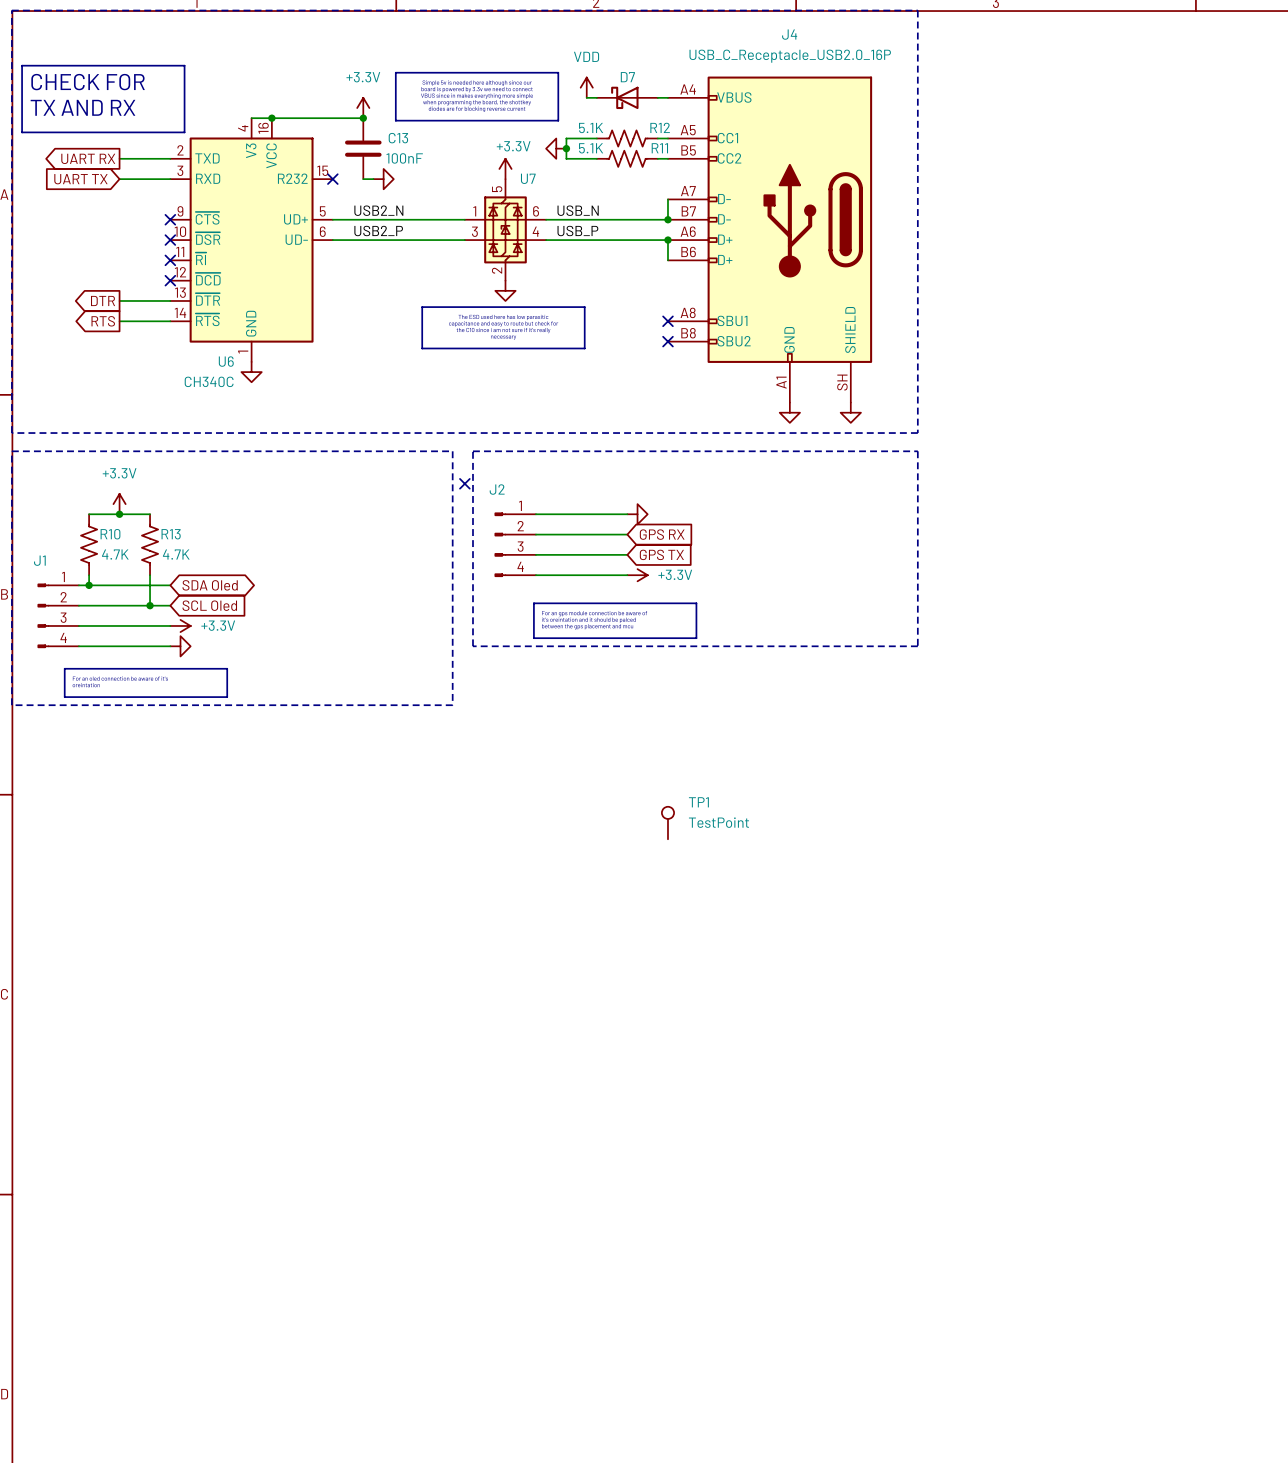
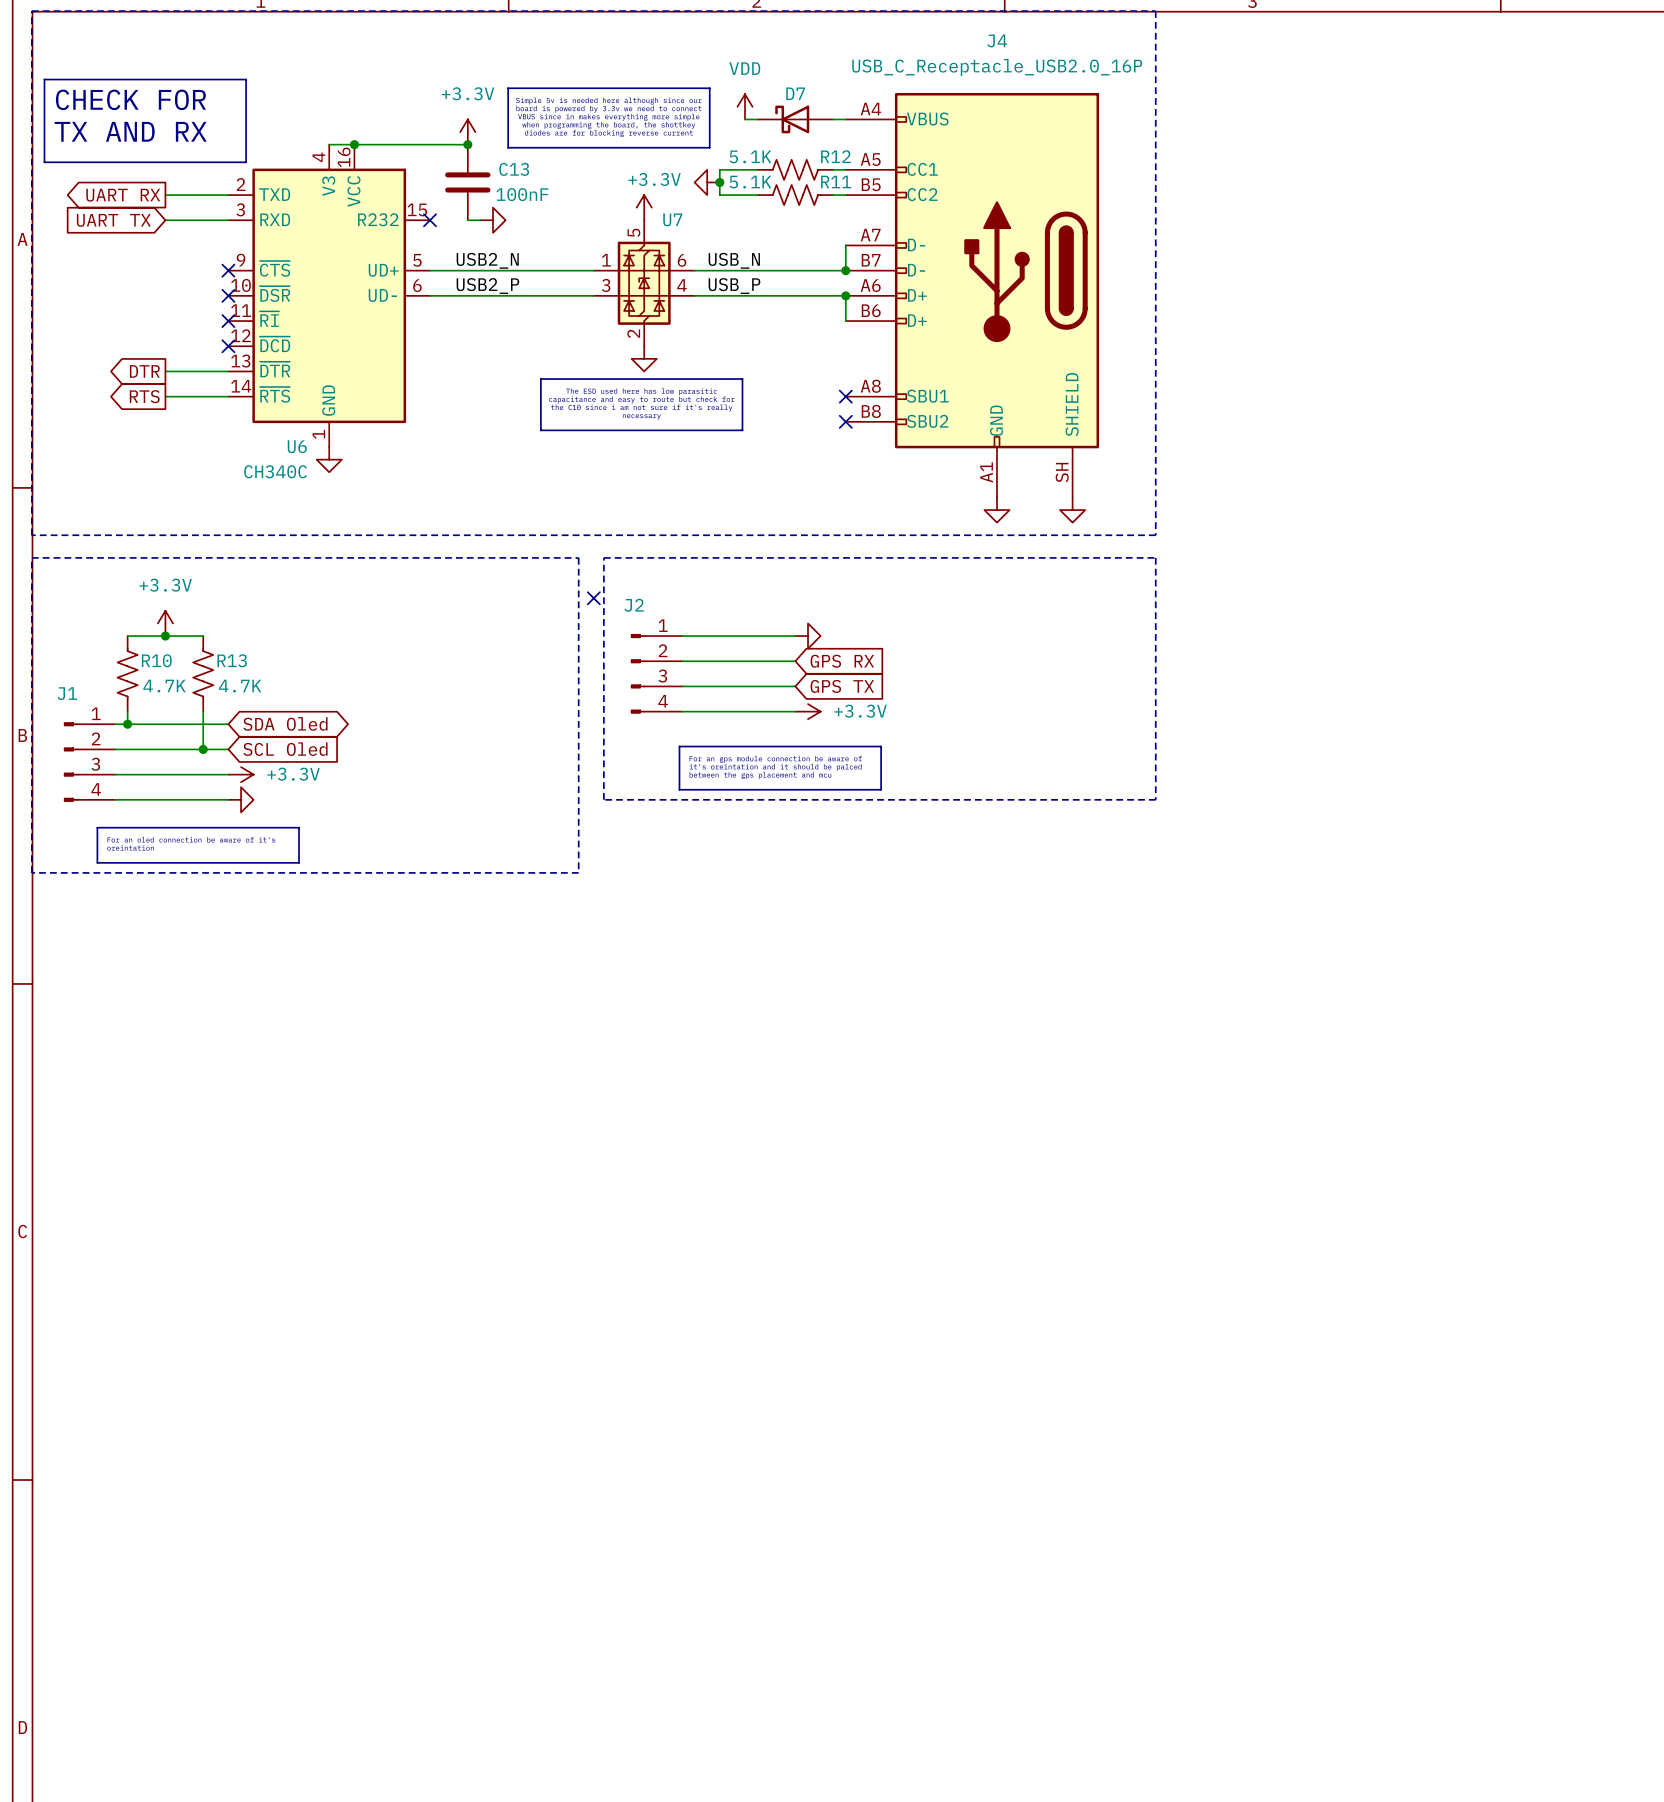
TP1: TestPoint (667, 823) -> none

